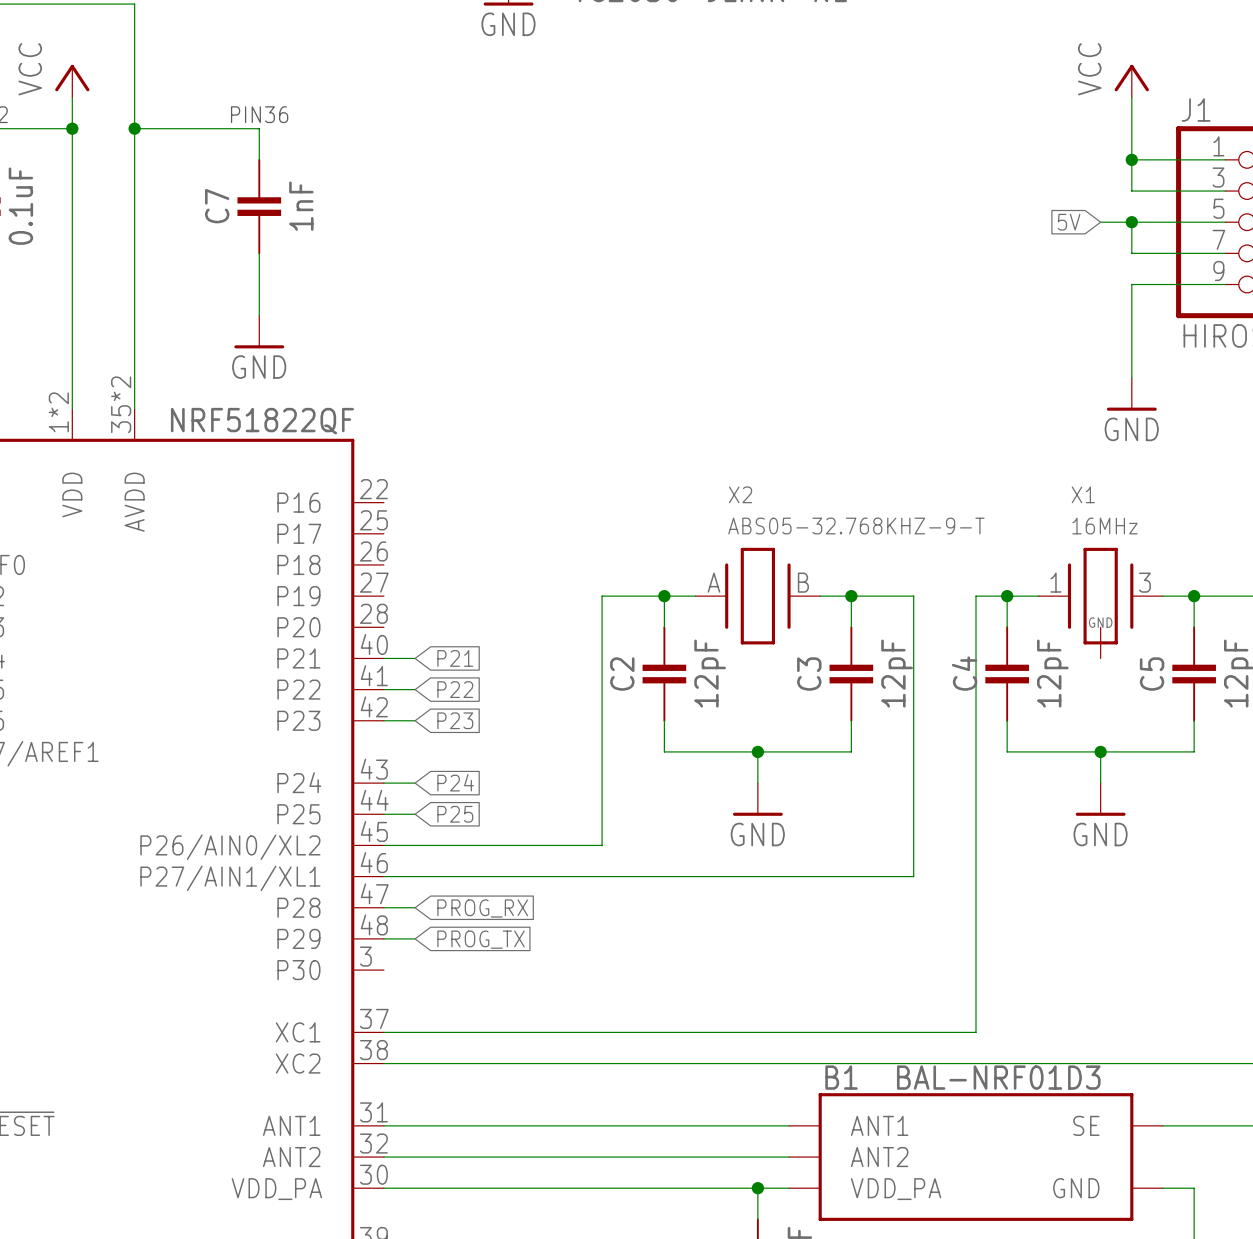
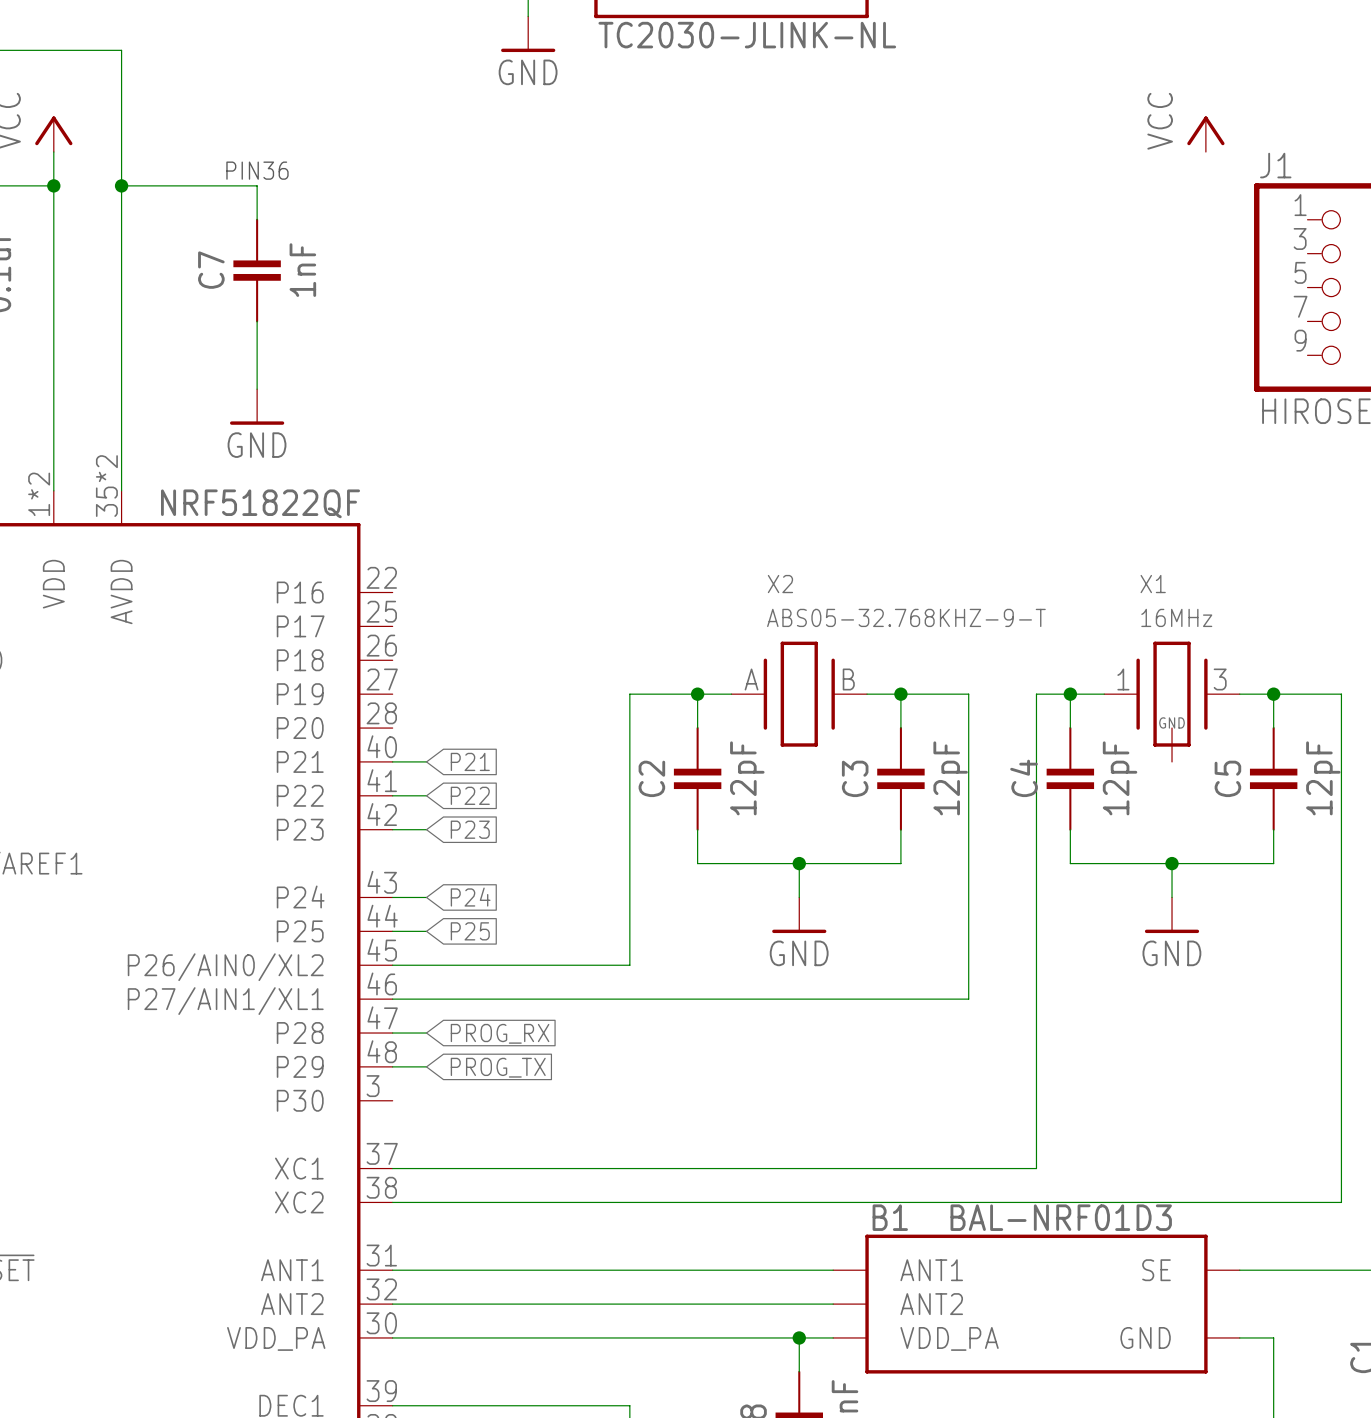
wire: (1131, 97) (1131, 191) (1225, 191) -> none
wire: (1131, 159) (1225, 159) -> none
junction: (1131, 159) -> none
global label: 5V (1069, 222) -> none
wire: (1100, 222) (1225, 222) -> none
wire: (1131, 222) (1131, 253) (1225, 253) -> none
junction: (1131, 222) -> none
wire: (1225, 284) (1131, 284) (1131, 378) -> none
power symbol: GND (1131, 394) -> none

